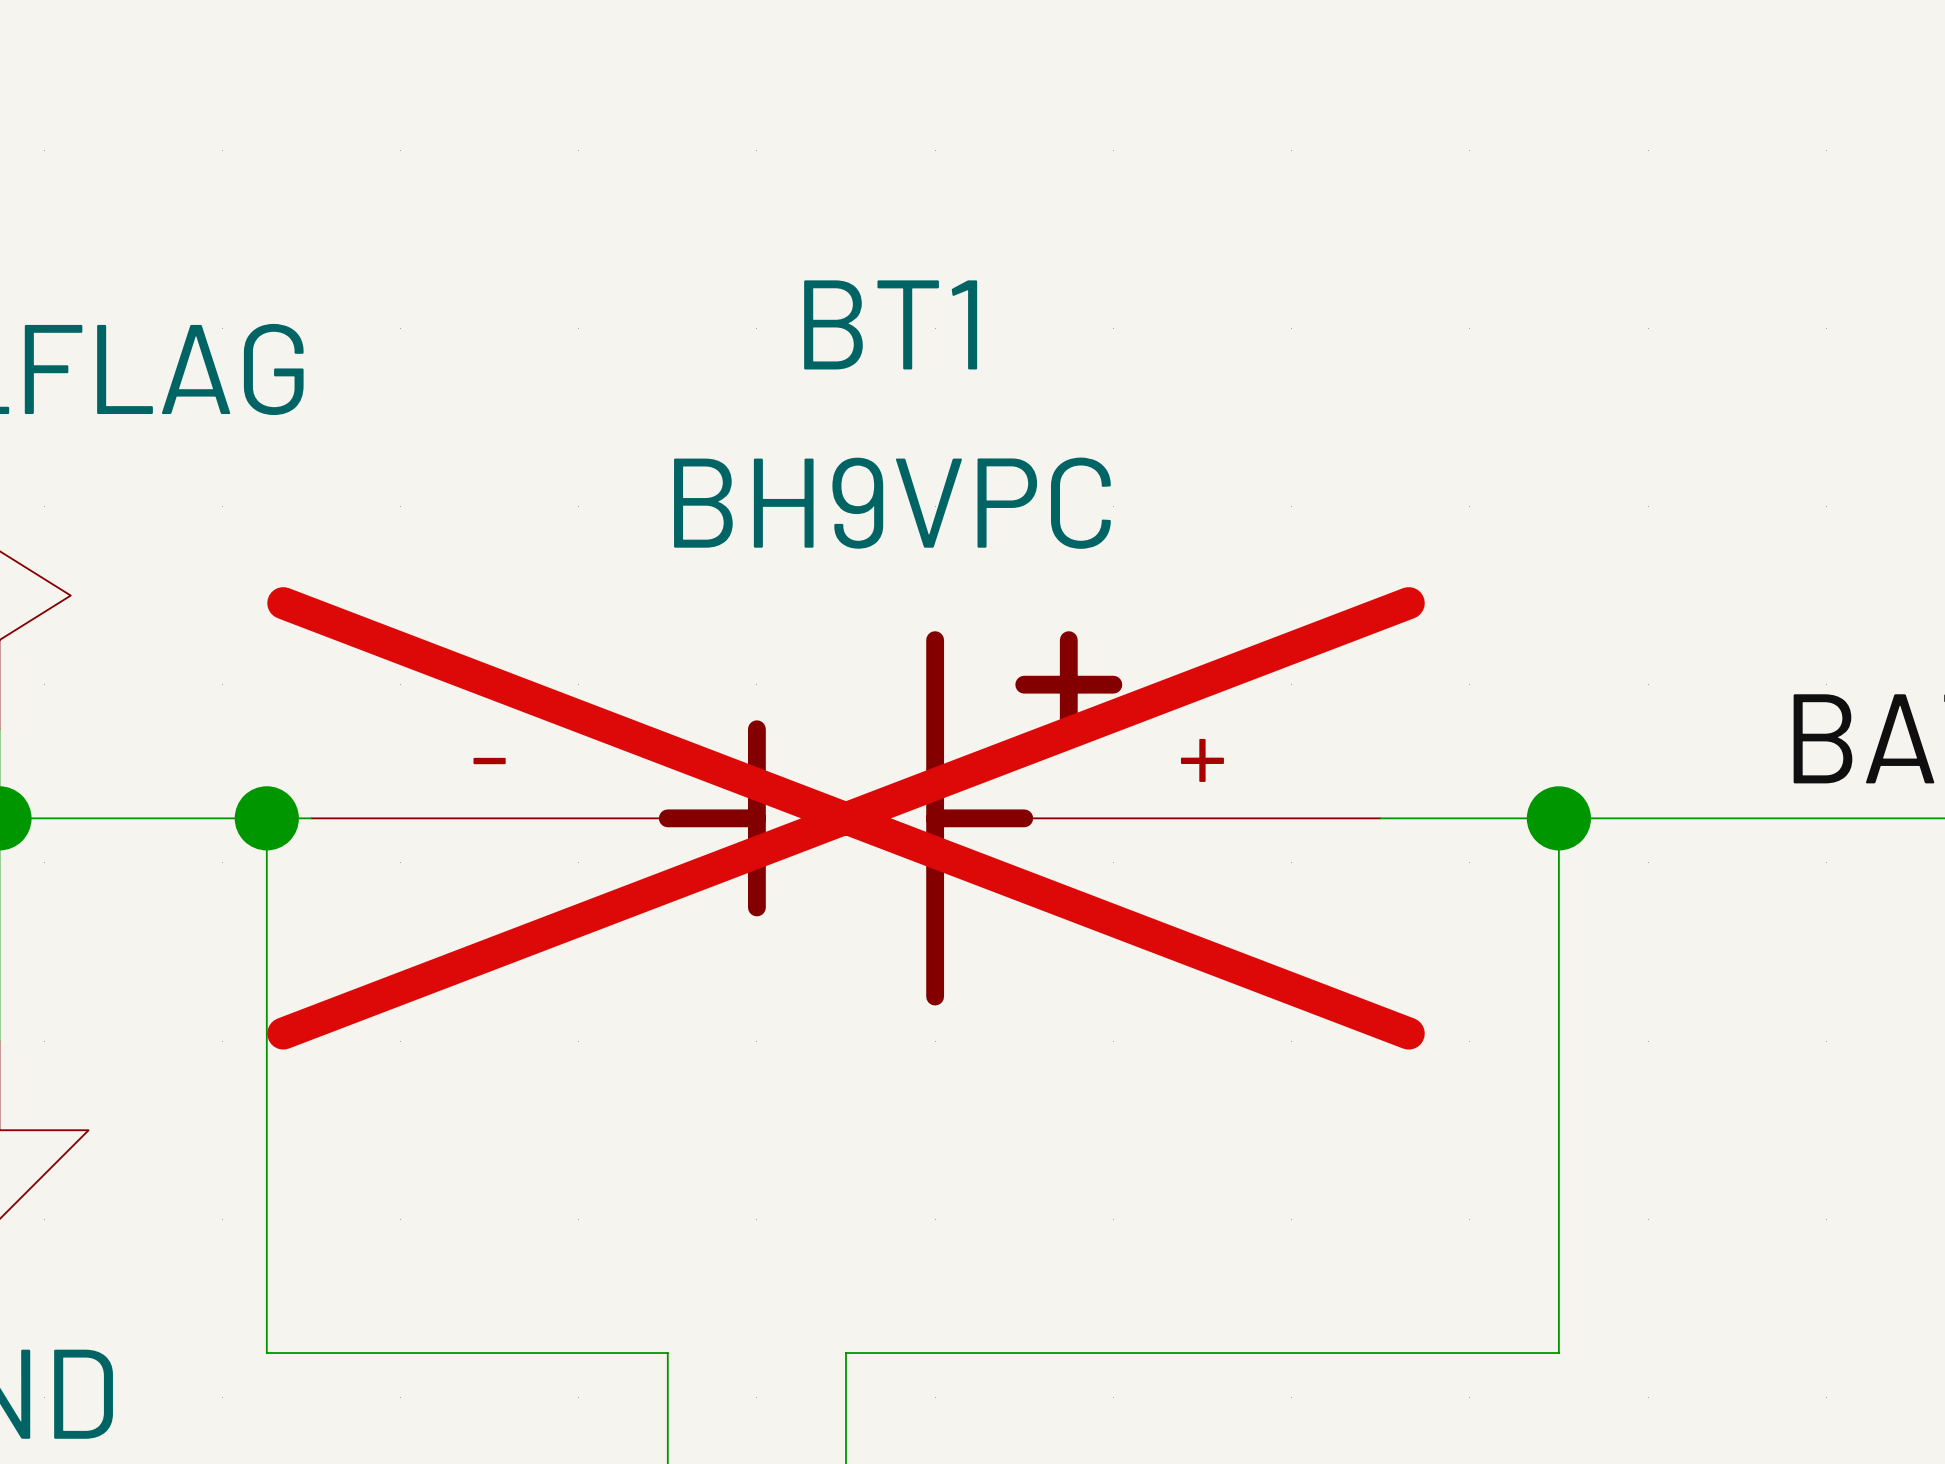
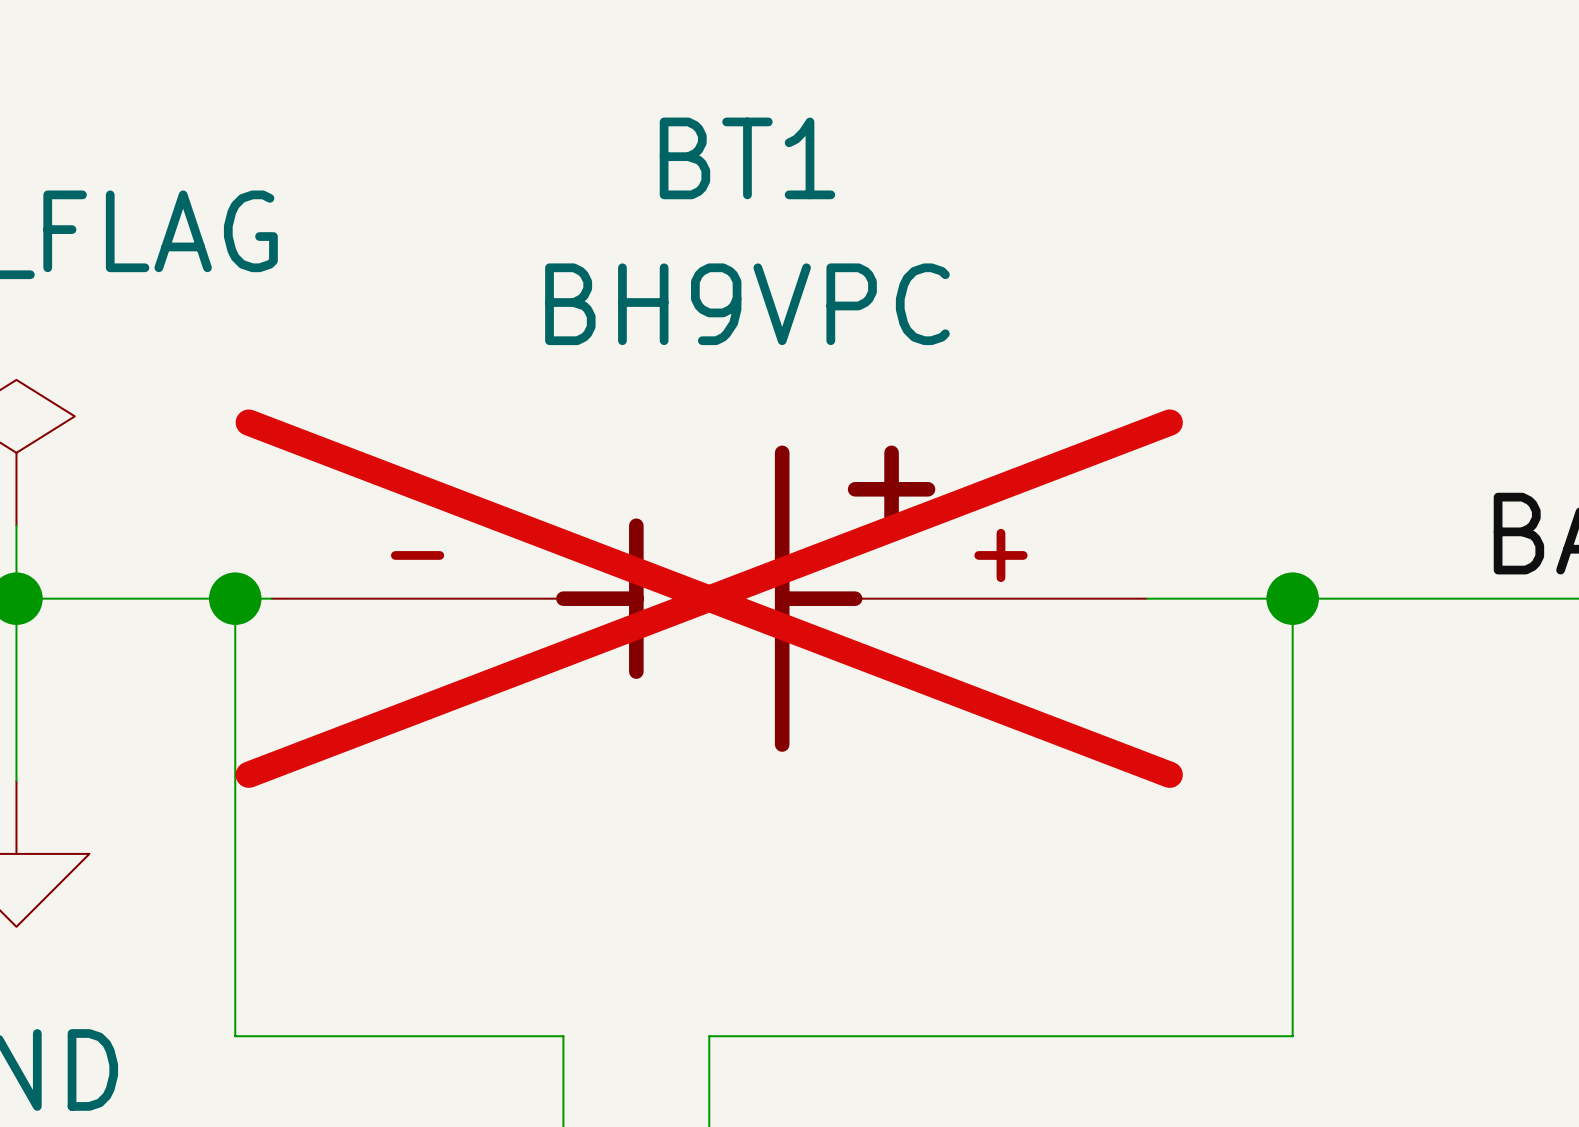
BT1 name position: BT1 (890, 324) -> BT1 (747, 158)
BT1 value position: BH9VPC (892, 503) -> BH9VPC (747, 304)

